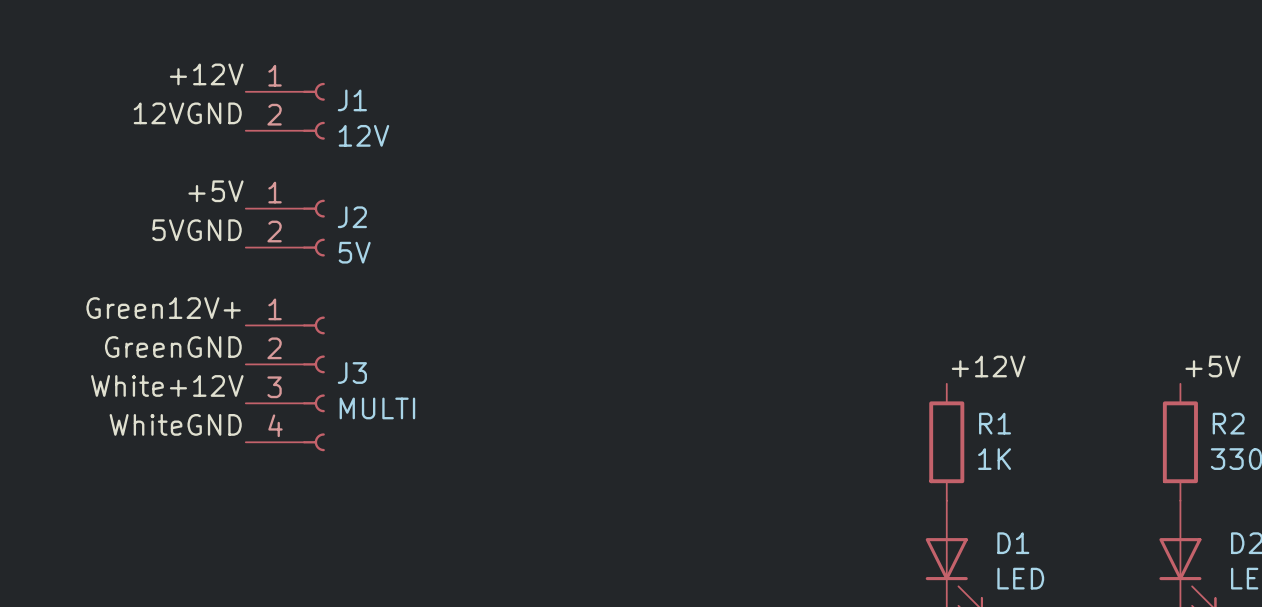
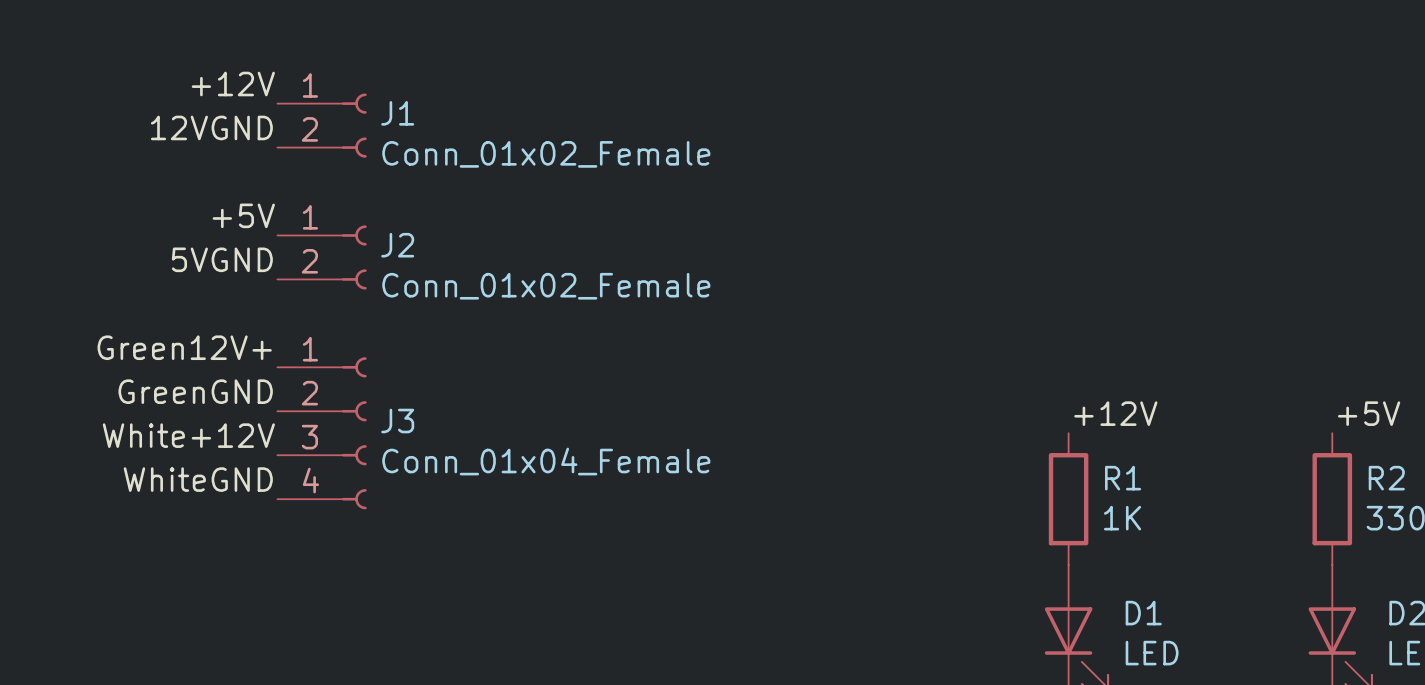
J1 value: 12V (363, 135) -> Conn_01x02_Female (546, 154)
J2 value: 5V (354, 252) -> Conn_01x02_Female (546, 286)
J3 value: MULTI (377, 408) -> Conn_01x04_Female (546, 461)

